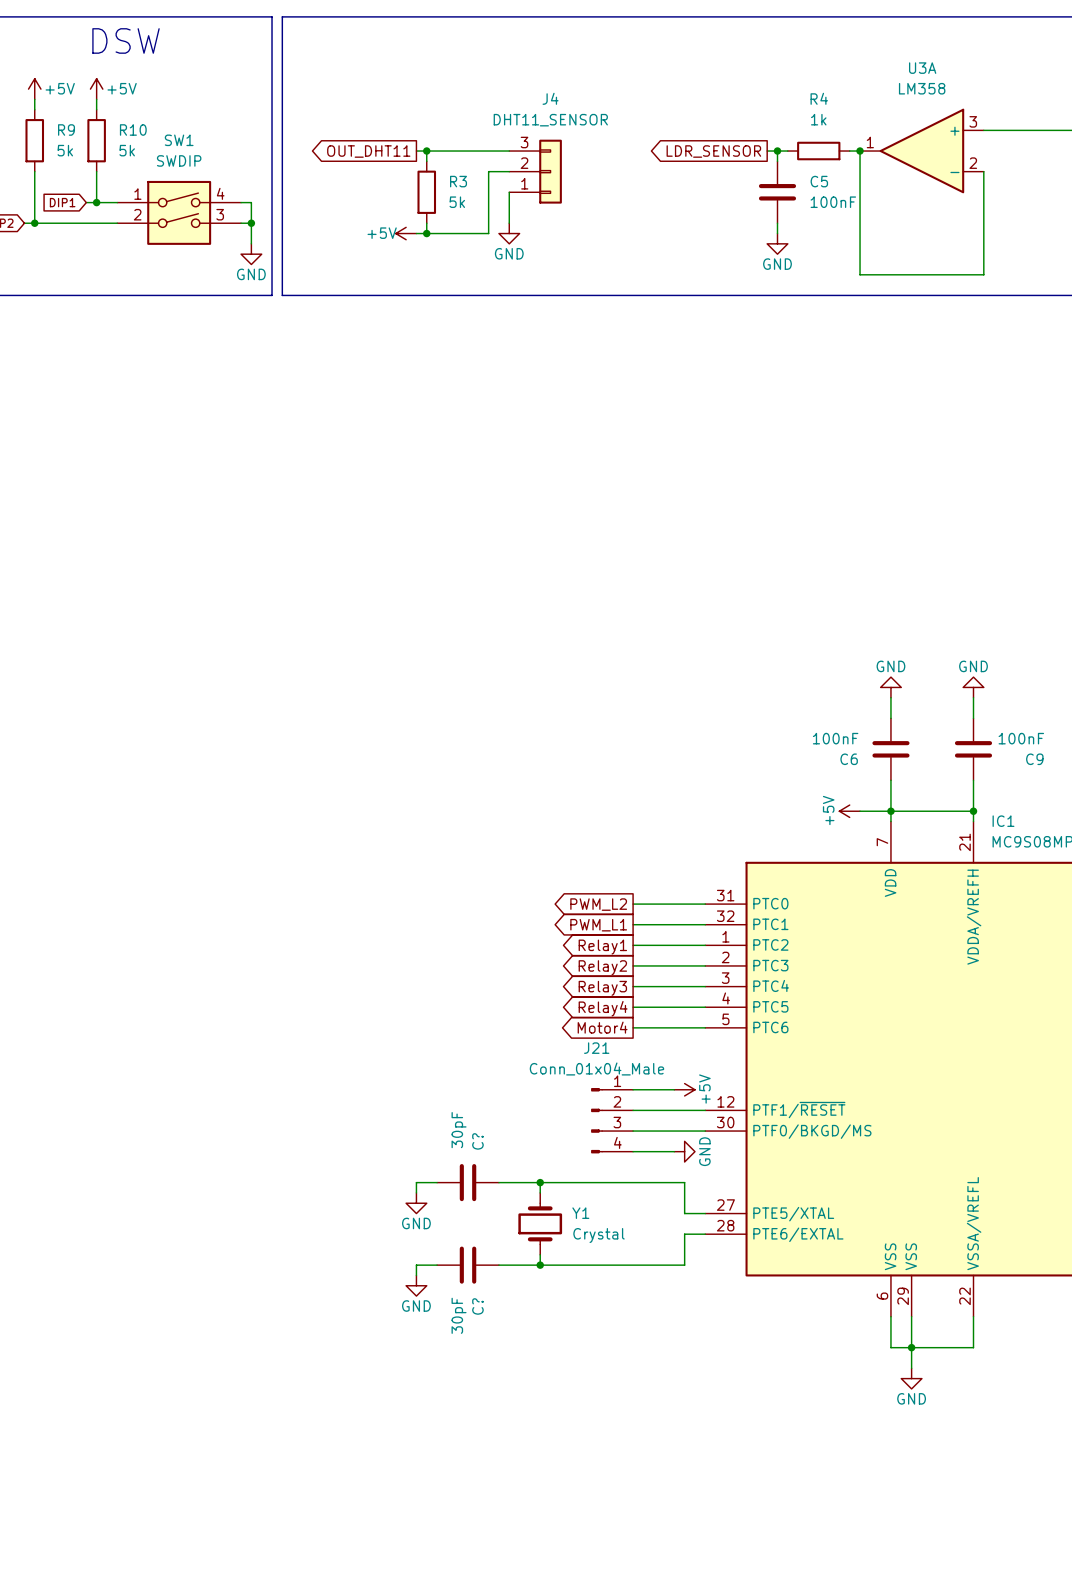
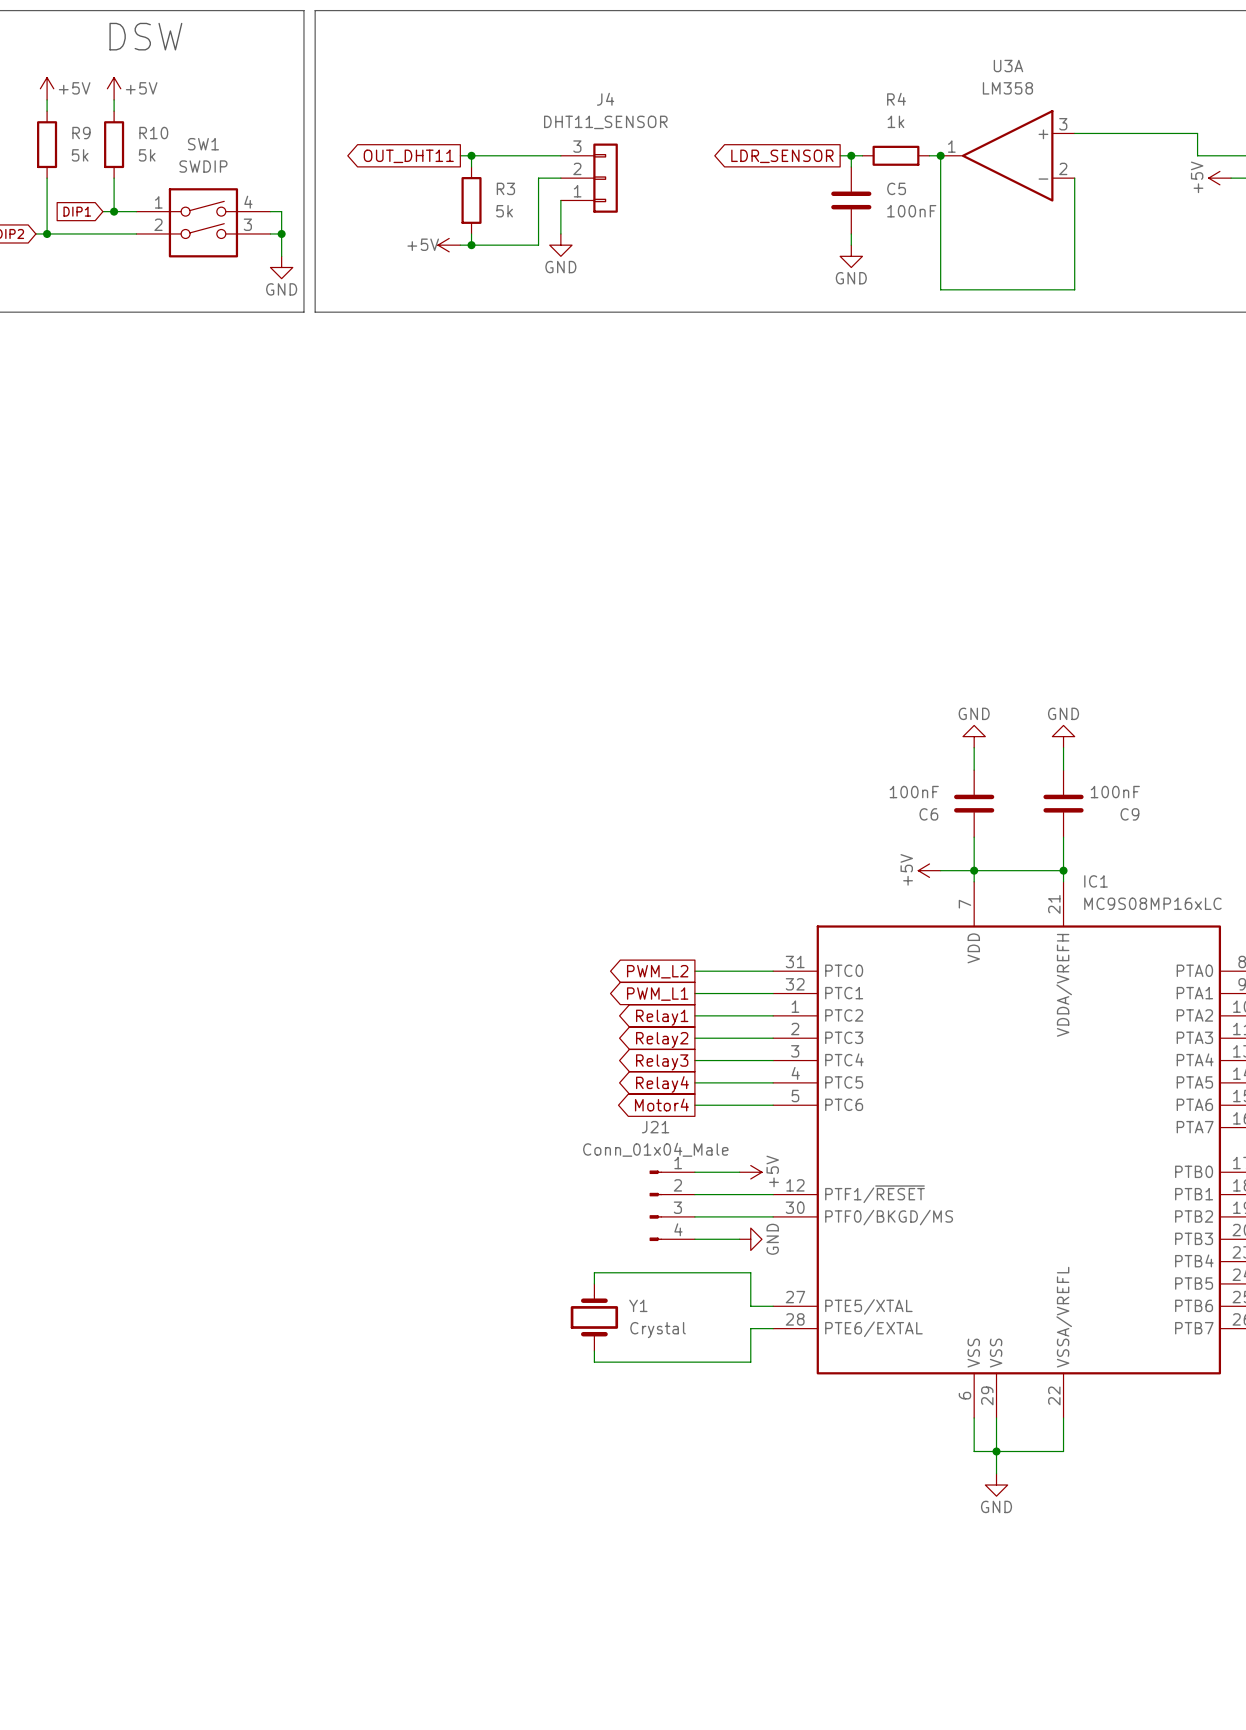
wire: (437, 1182) (416, 1182) (416, 1192) -> none
C?: 30pF (468, 1182) -> none
wire: (498, 1182) (540, 1182) -> none
junction: (540, 1182) -> none
power symbol: GND (416, 1203) -> none
wire: (437, 1265) (416, 1265) (416, 1275) -> none
C?: 30pF (468, 1265) -> none
wire: (498, 1265) (540, 1265) -> none
junction: (540, 1265) -> none
power symbol: GND (416, 1285) -> none

